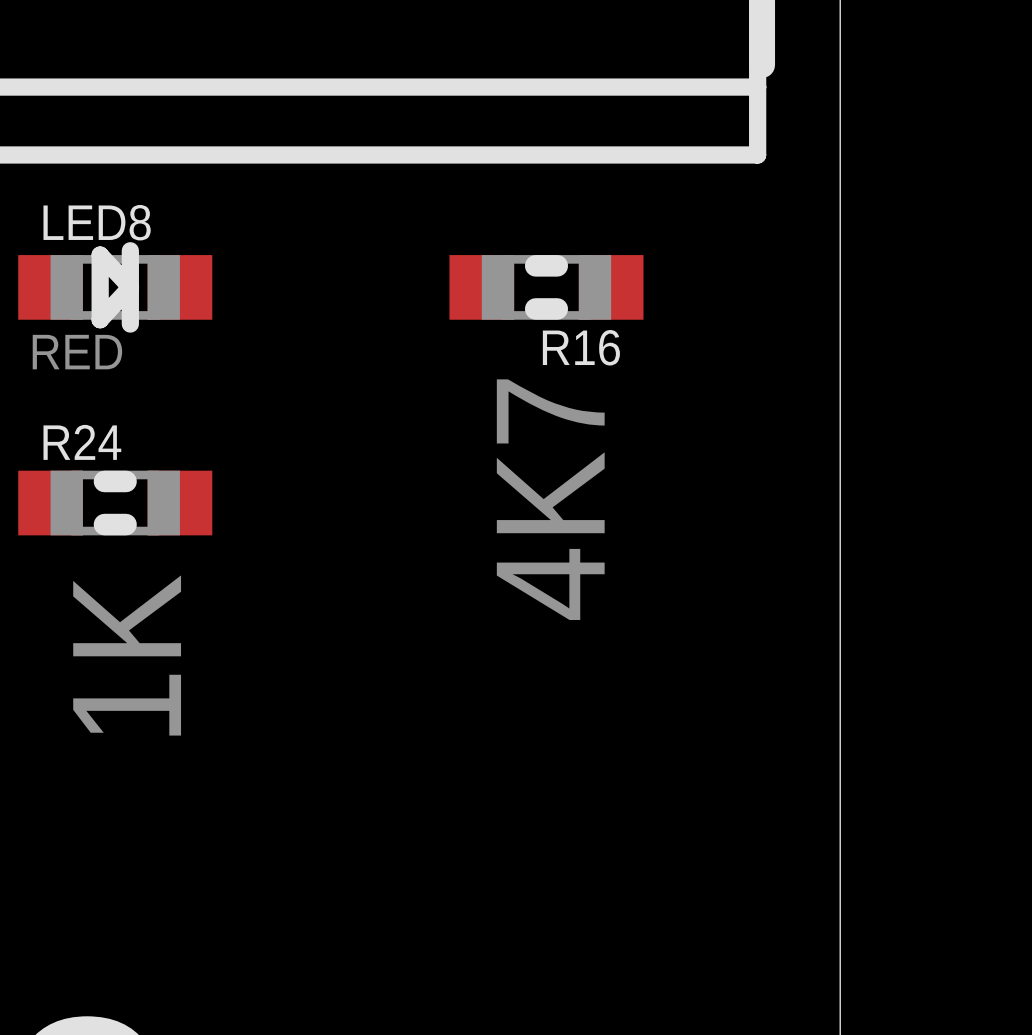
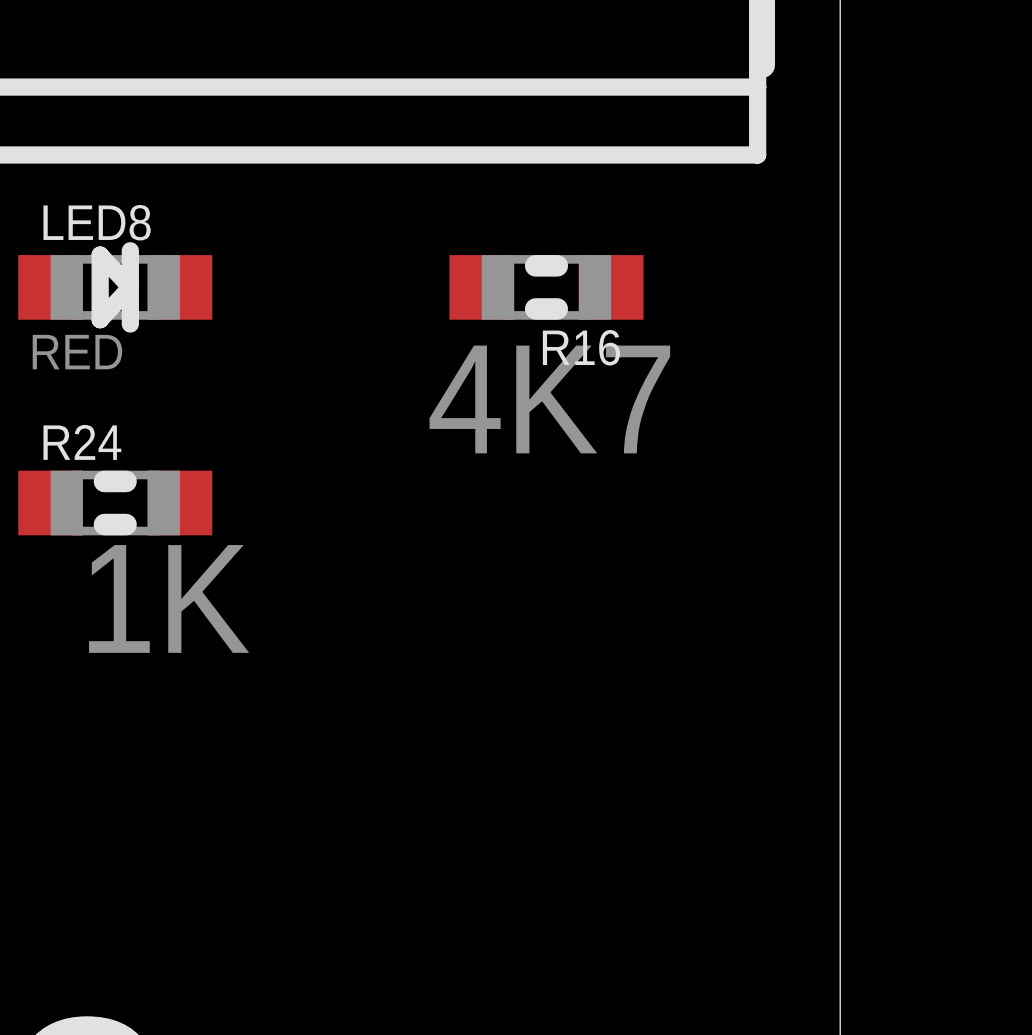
R16 value rotation: 0° (550, 499) -> 90° clockwise (549, 399)
R24 value rotation: 0° (127, 655) -> 90° clockwise (169, 598)

